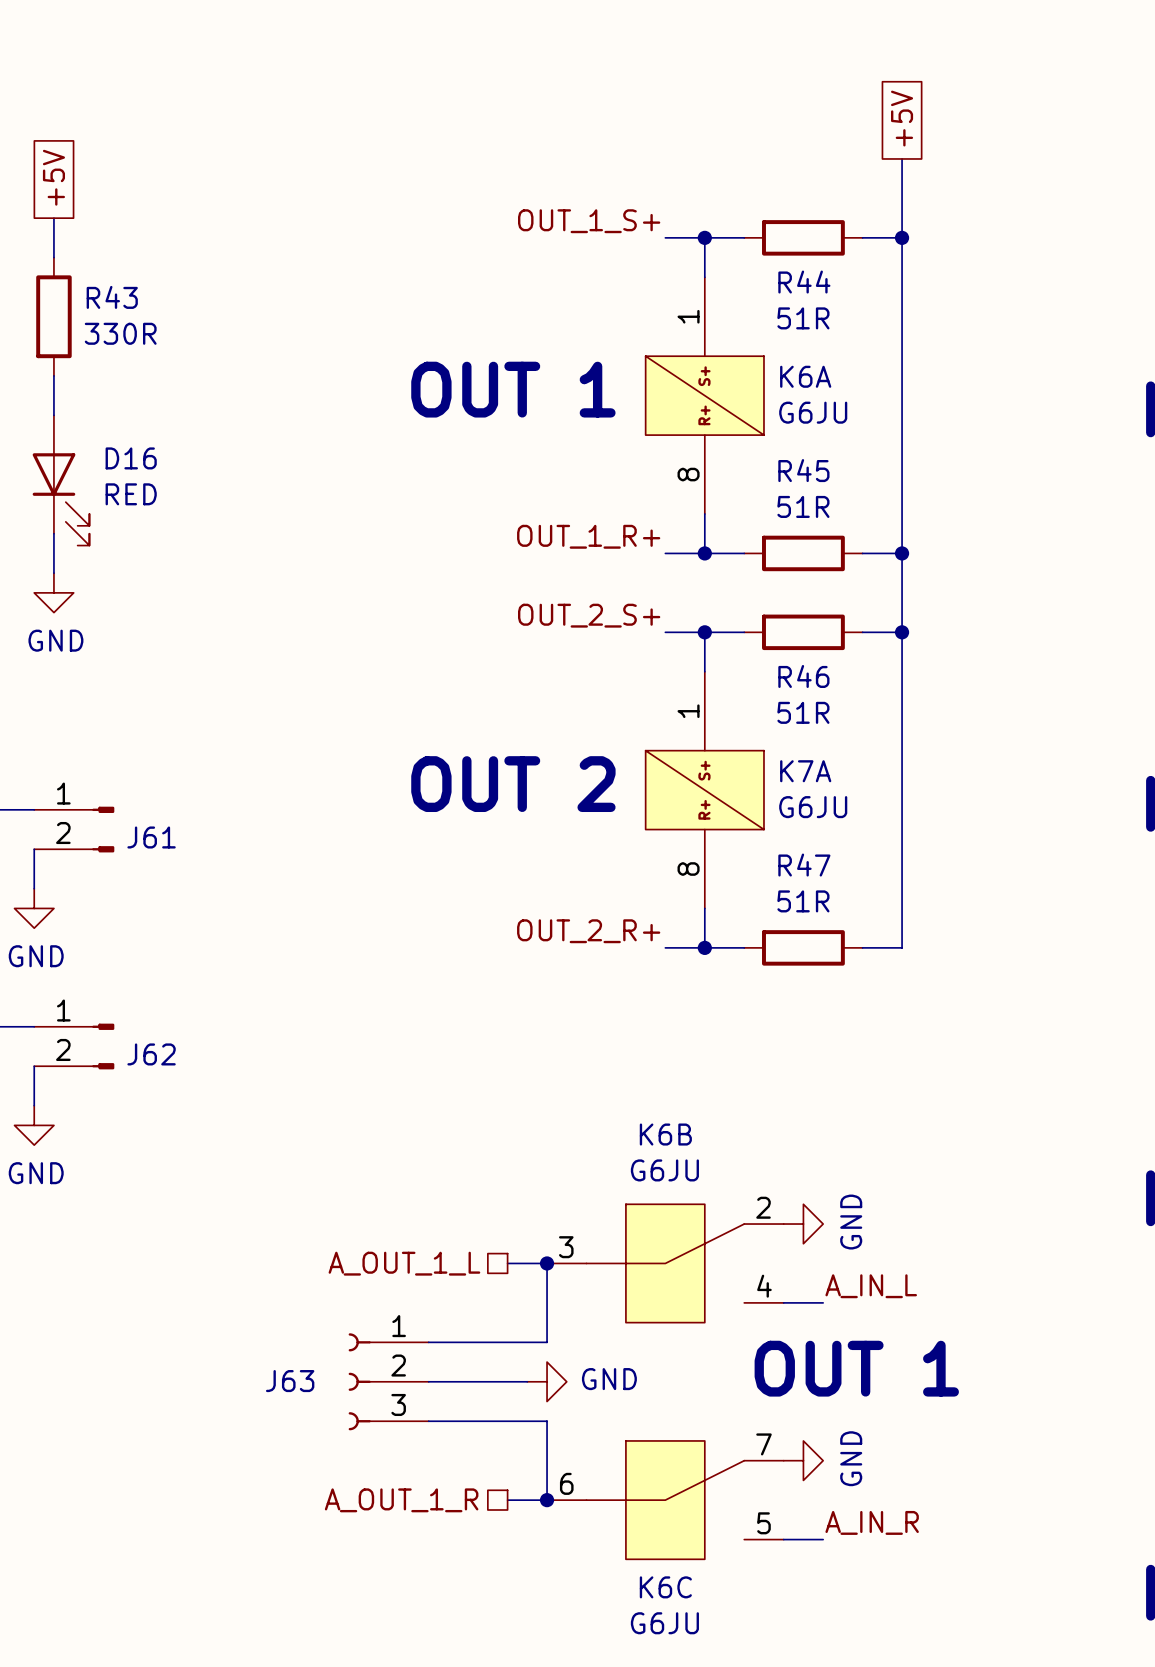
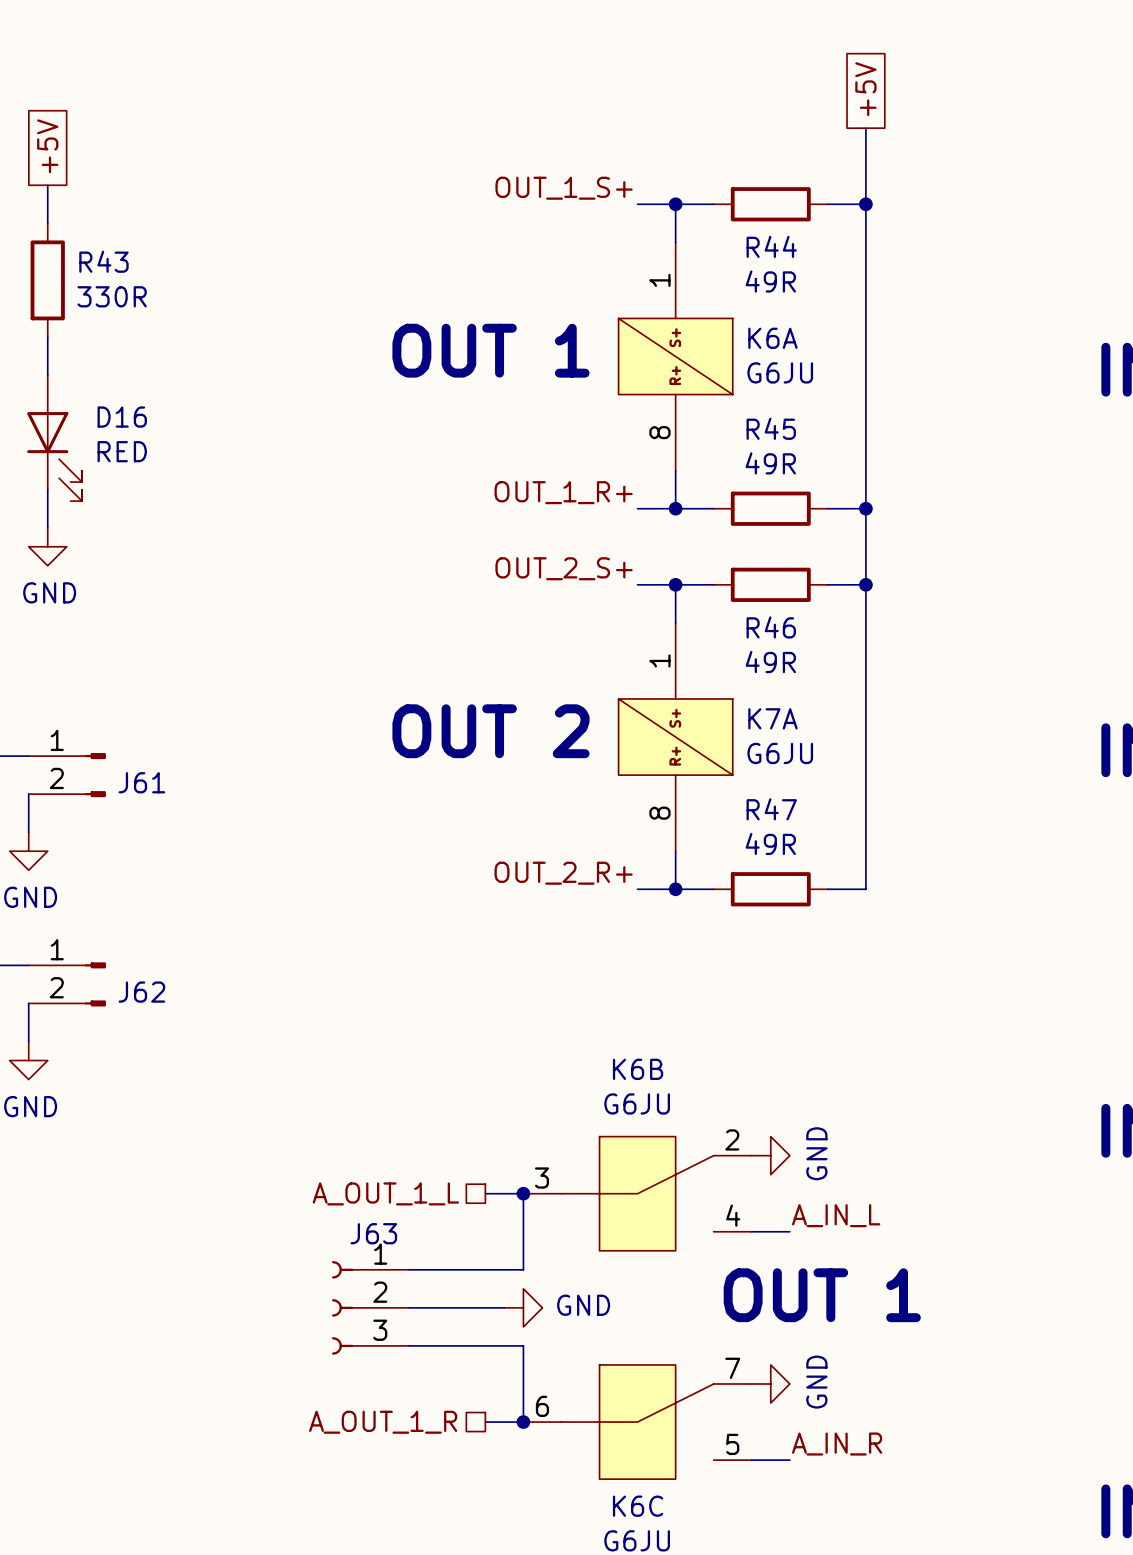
R44 value: 51R (803, 318) -> 49R (770, 281)
R45 value: 51R (803, 506) -> 49R (770, 463)
R46 value: 51R (803, 712) -> 49R (770, 662)
R47 value: 51R (803, 901) -> 49R (770, 843)
J63 name position: J63 (290, 1381) -> J63 (373, 1233)

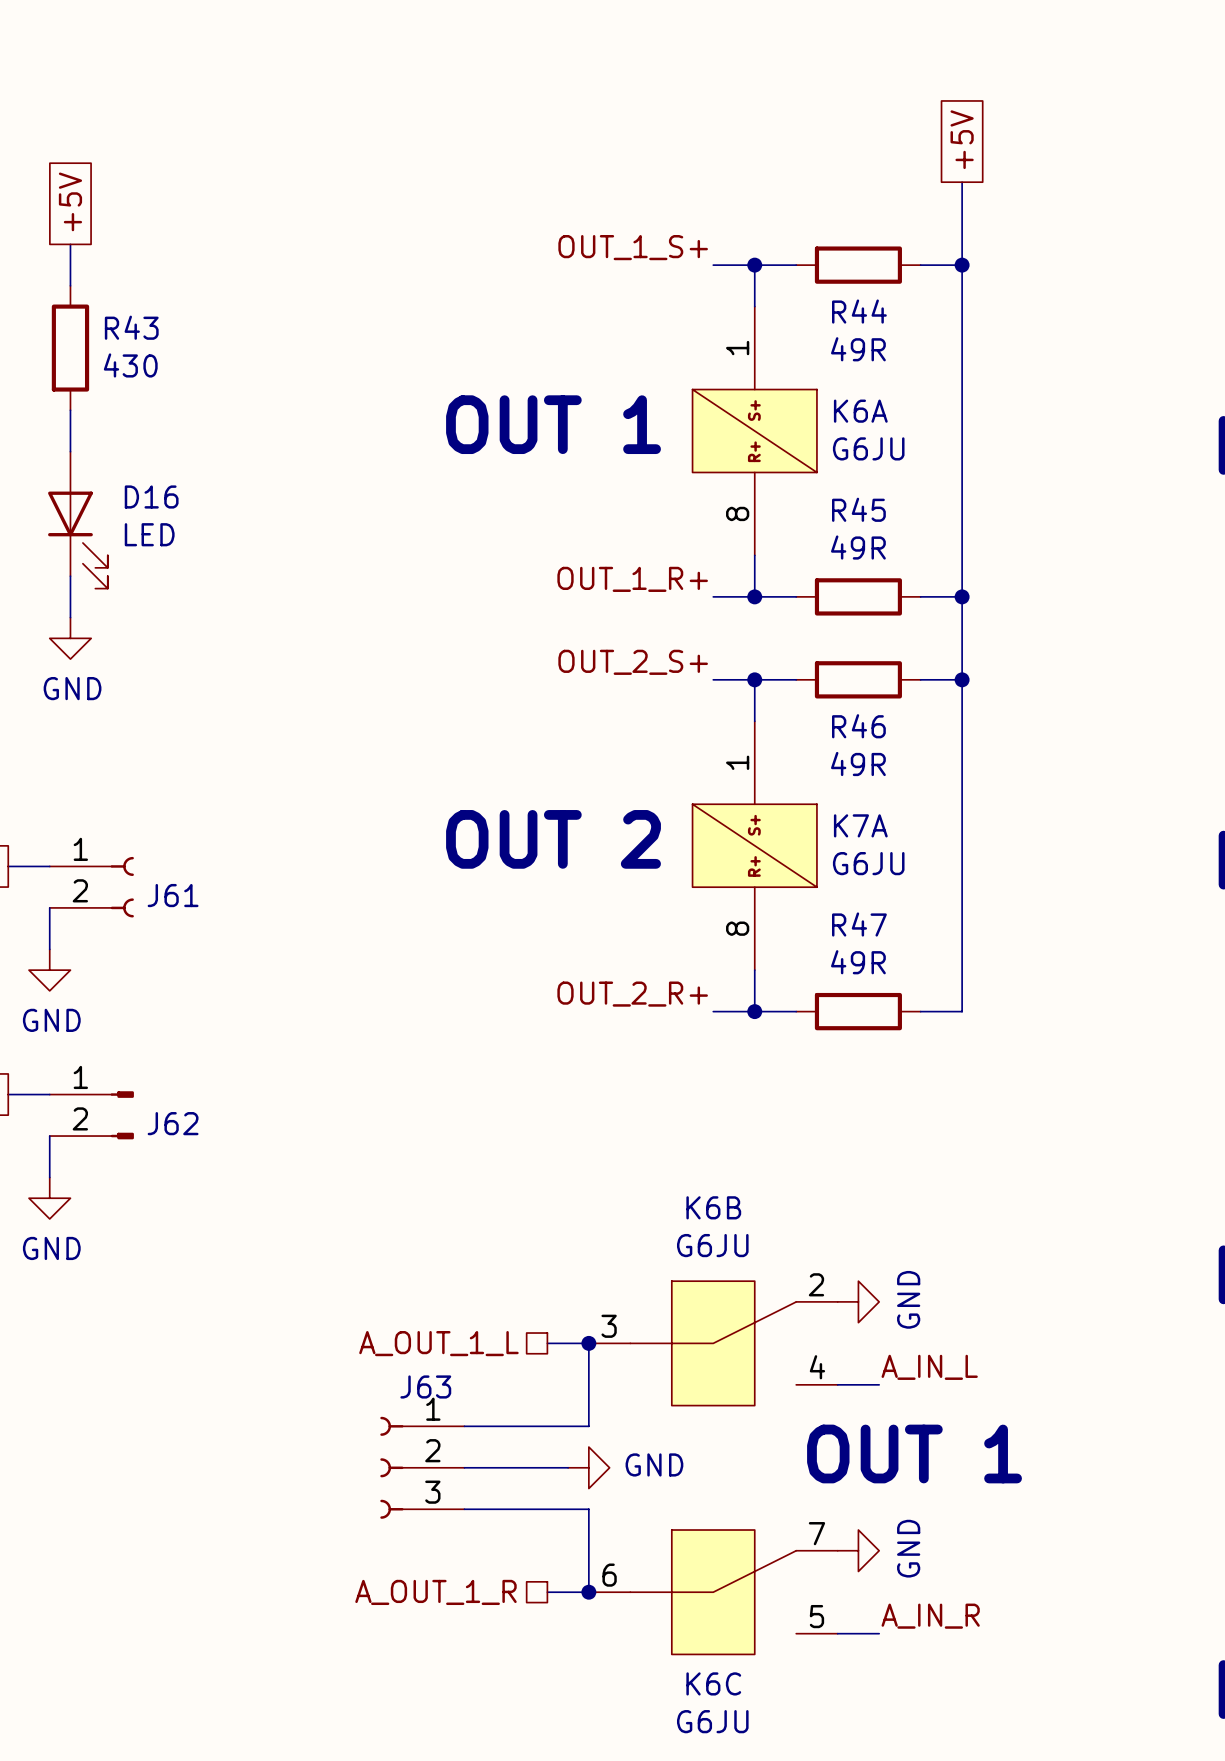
R43 value: 330R (112, 296) -> 430 (130, 365)
D16 value: RED (122, 451) -> LED (149, 534)
J61 symbol: [28, 753, 106, 798] -> [49, 856, 134, 918]

